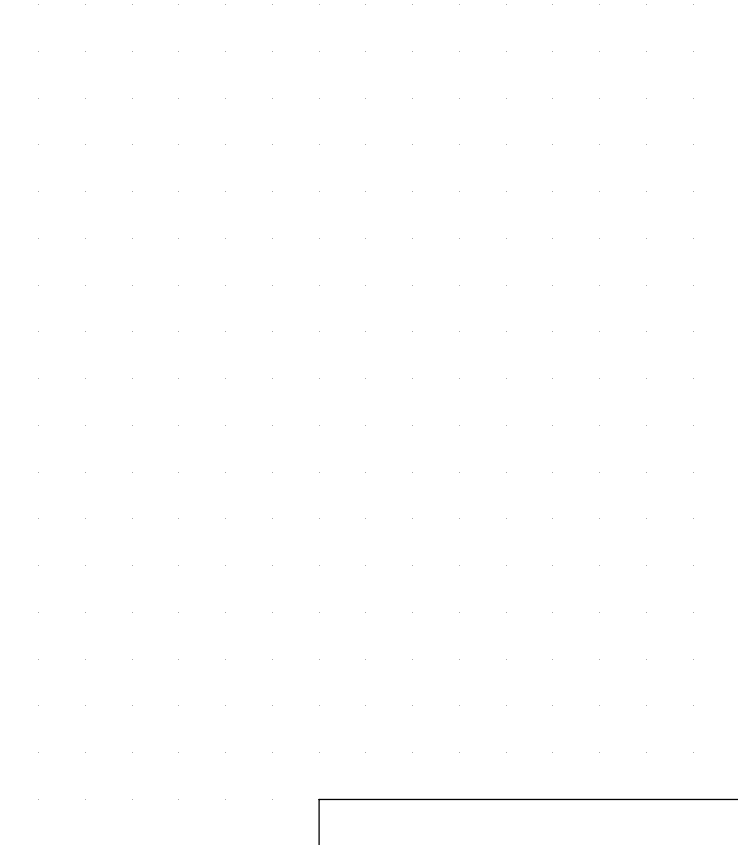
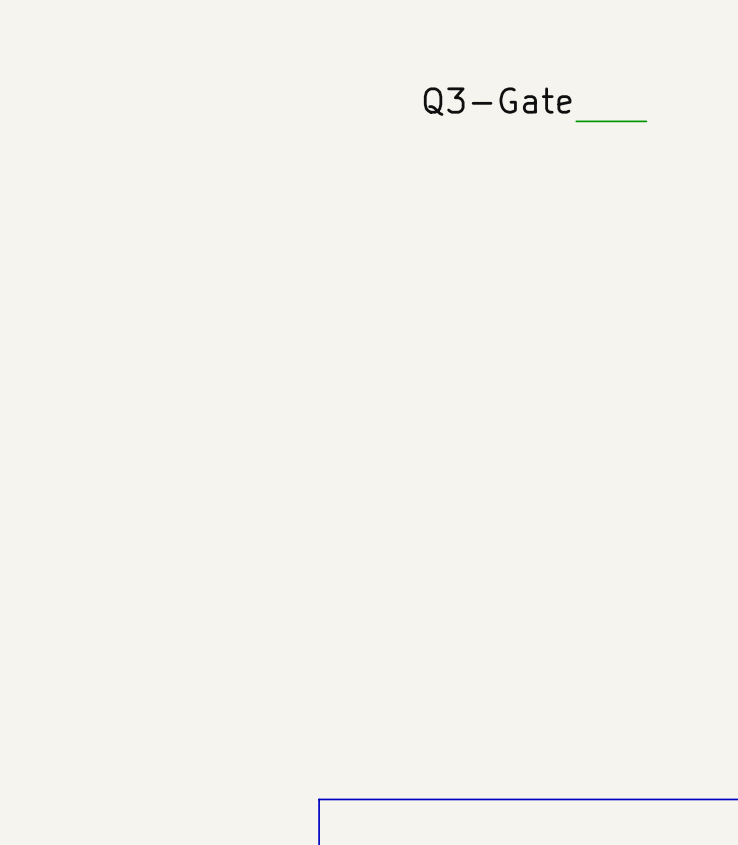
label: none -> Q3-Gate (497, 101)
wire: none -> (576, 121) (646, 121)

